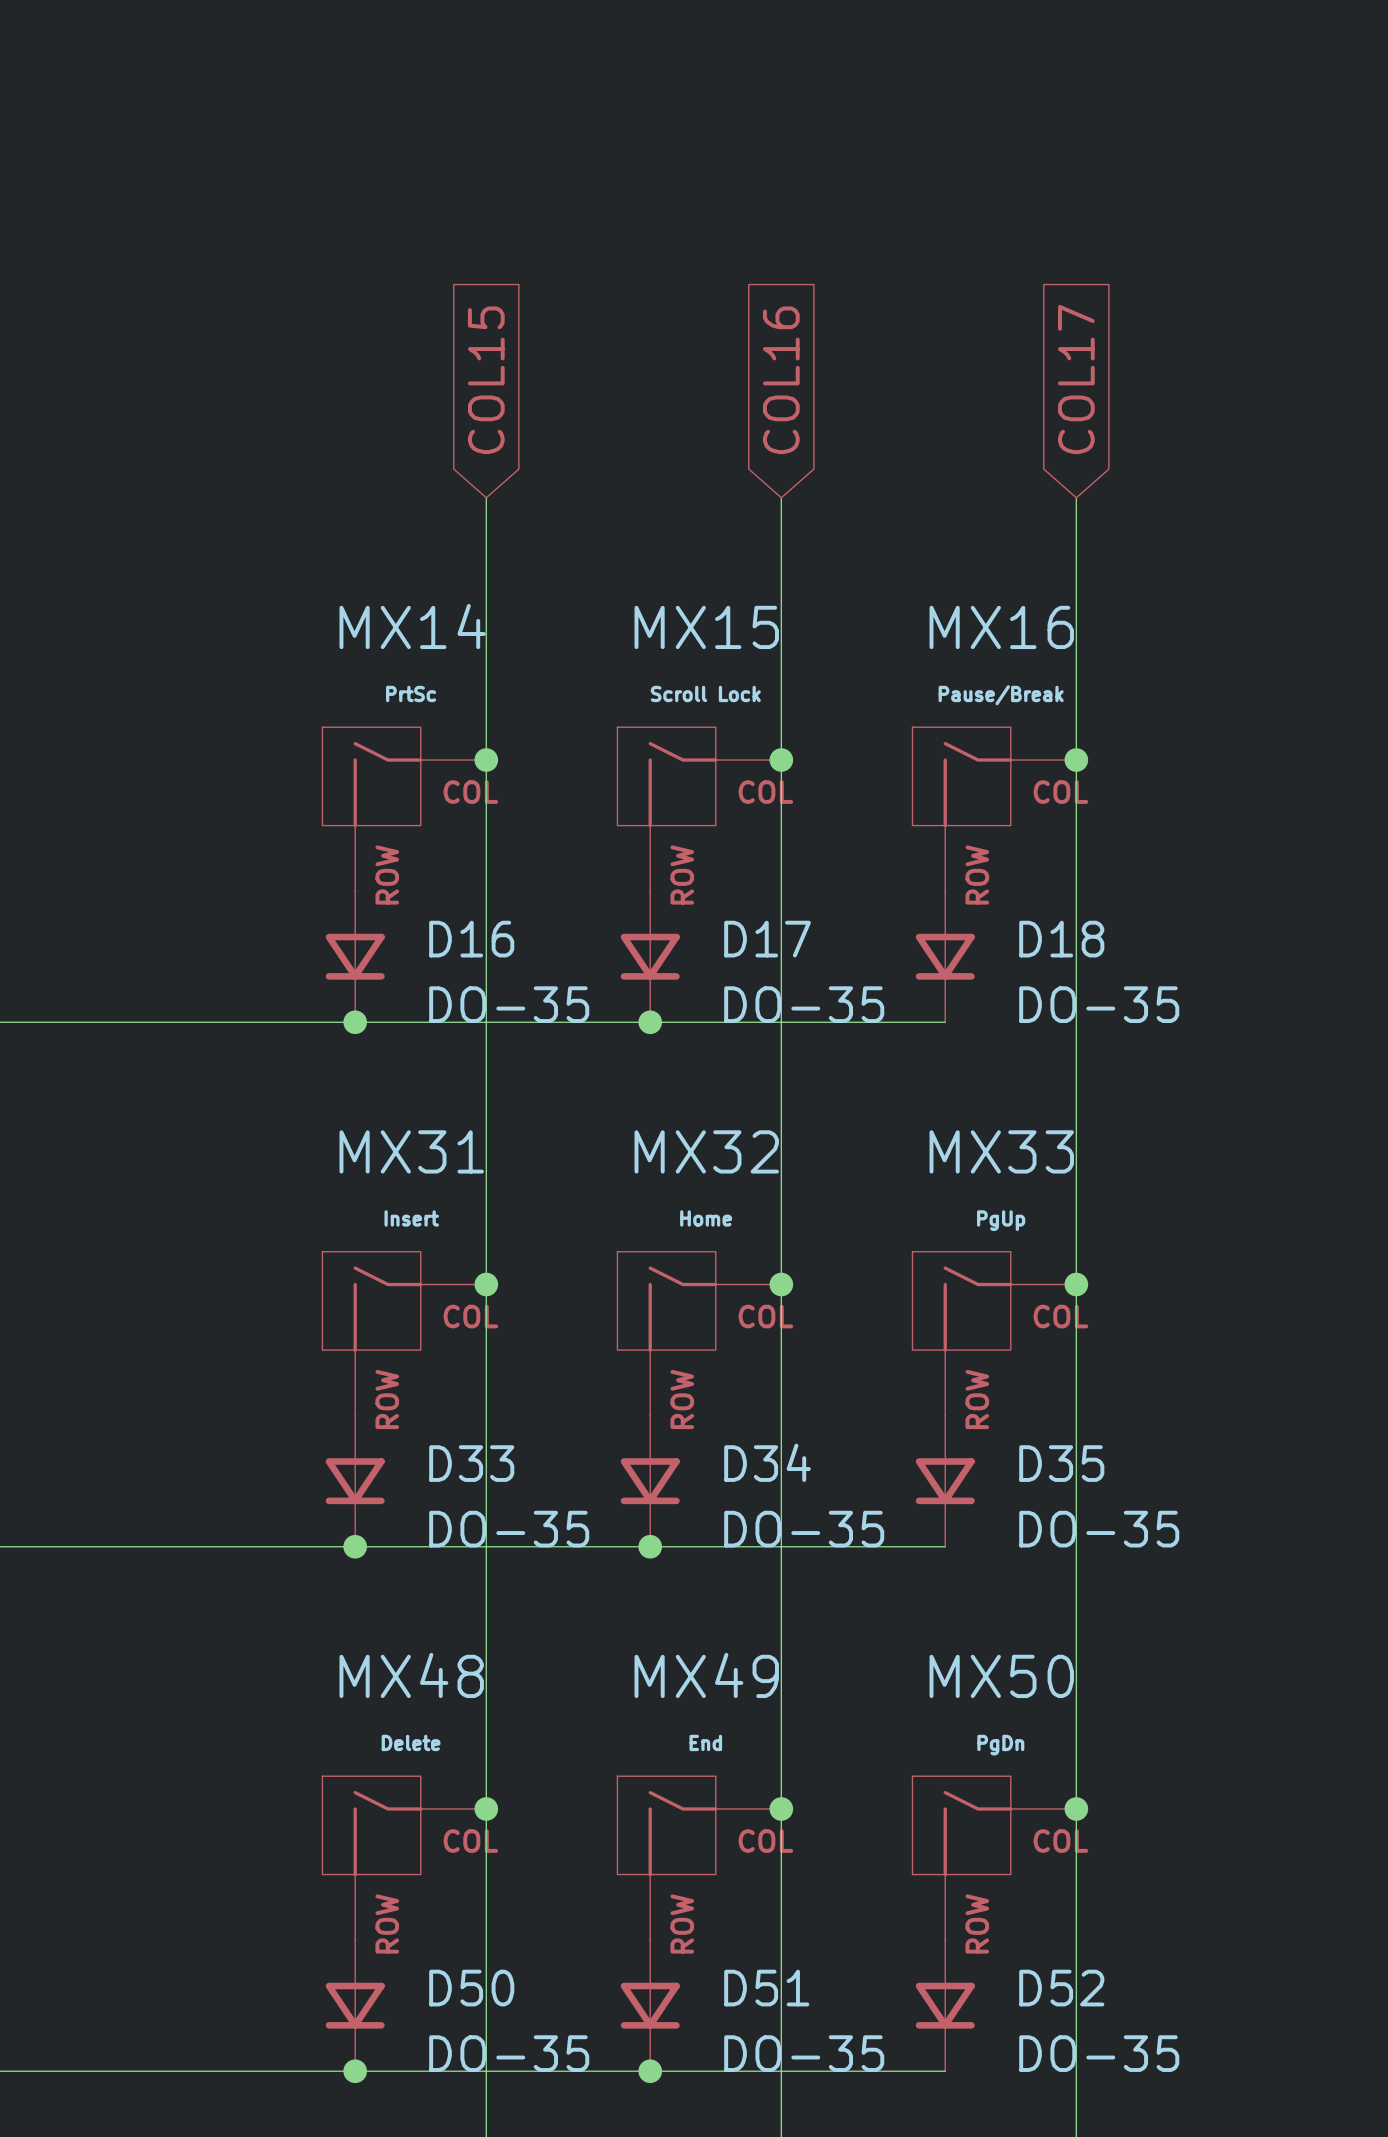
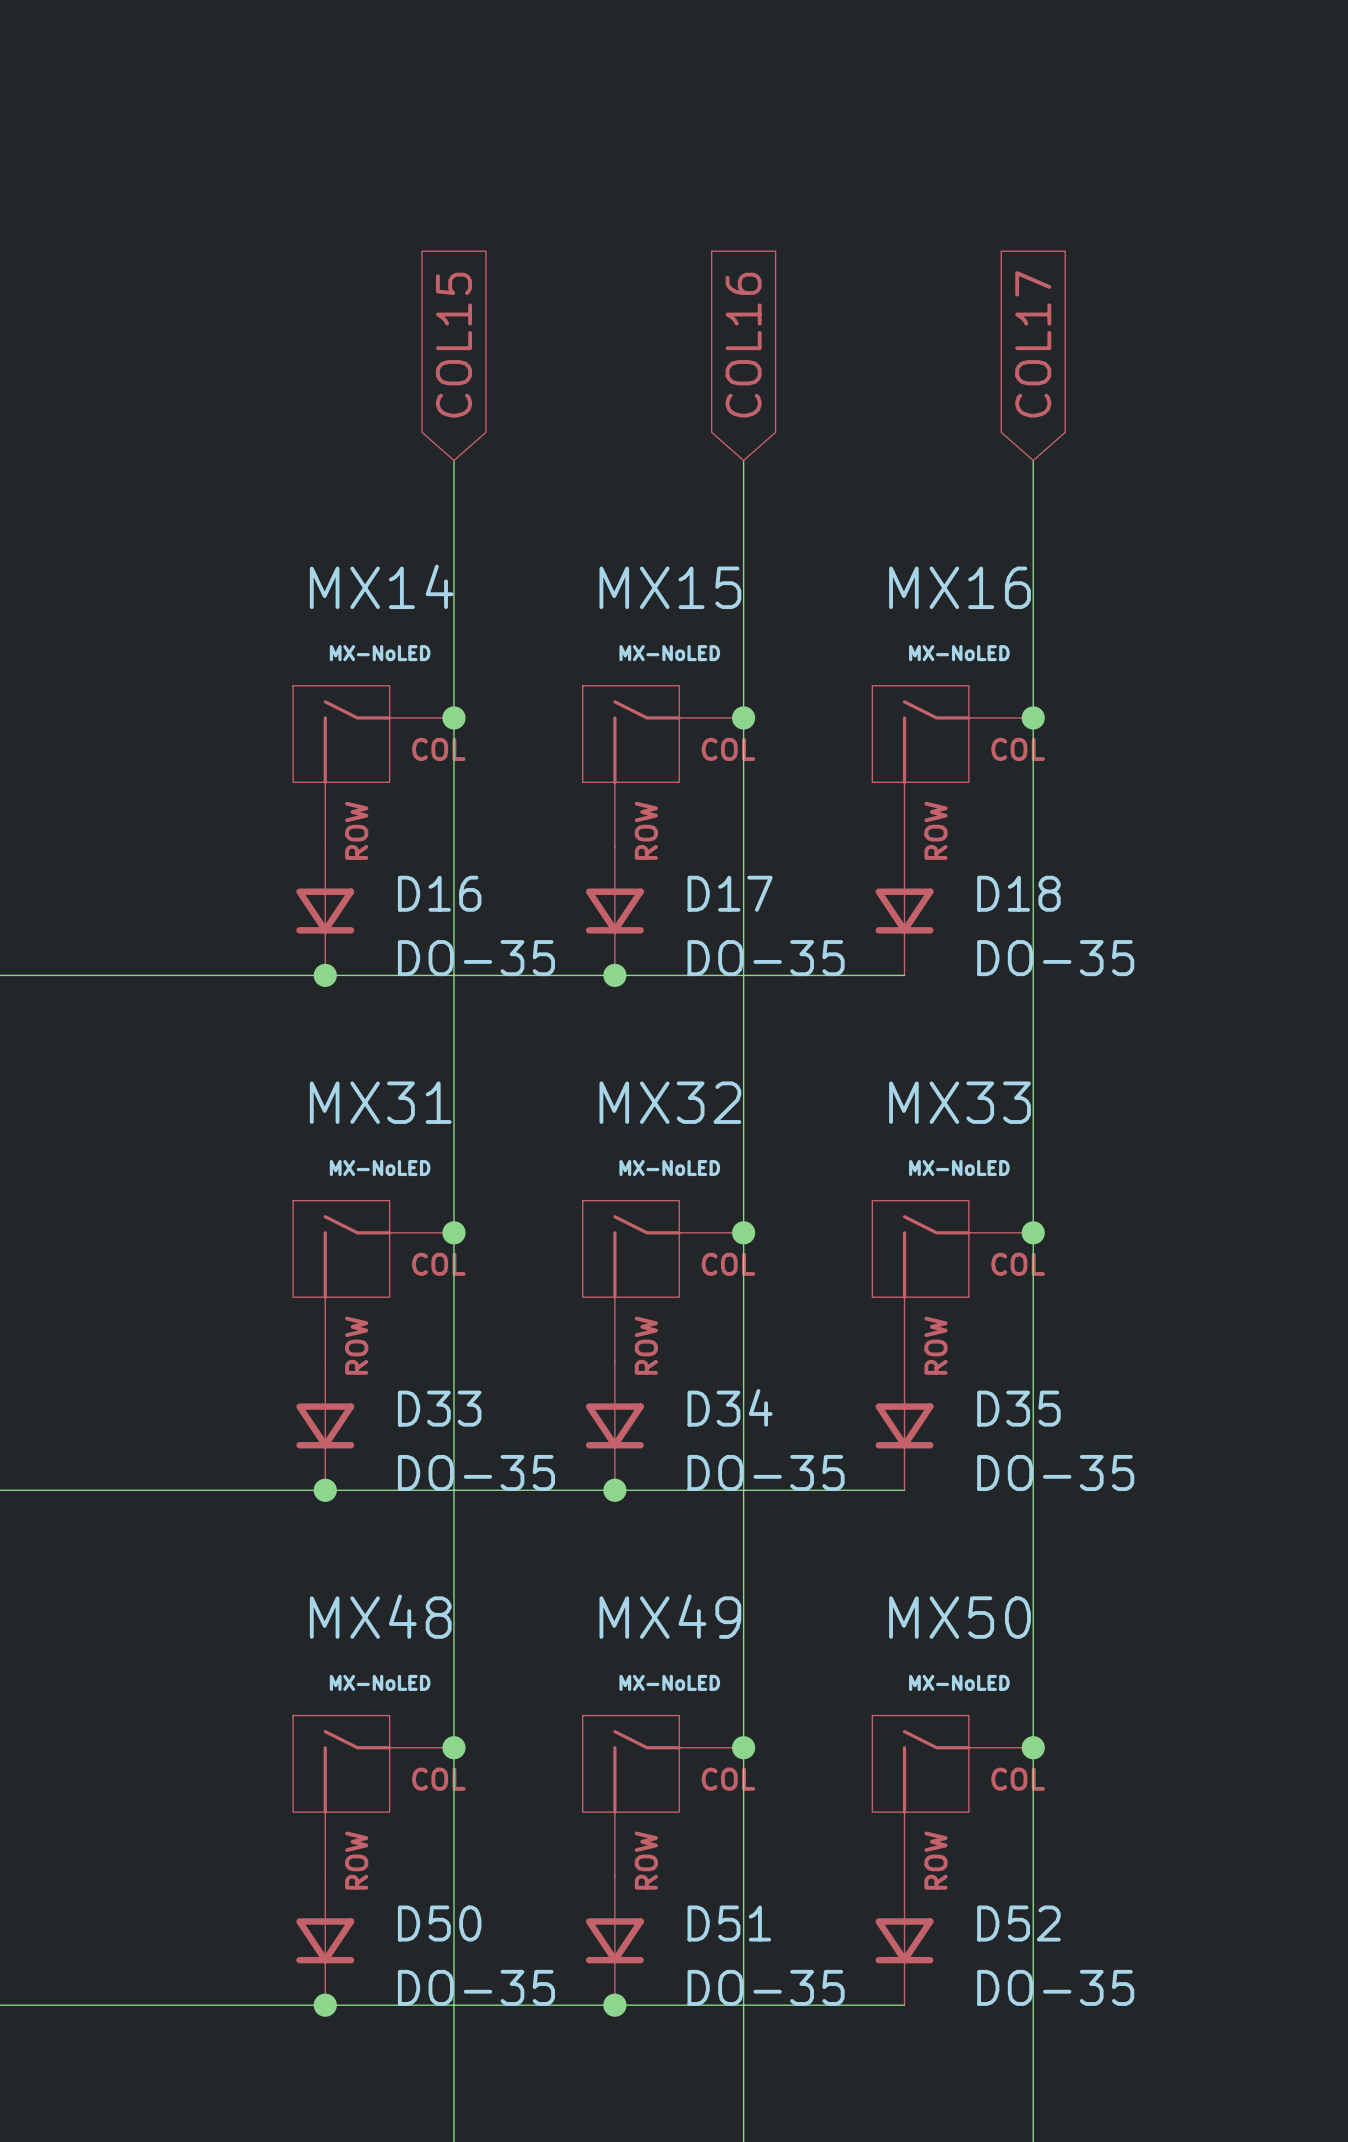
MX14 value: PrtSc (411, 693) -> MX-NoLED (380, 653)
MX15 value: Scroll Lock (705, 693) -> MX-NoLED (669, 653)
MX16 value: Pause/Break (1001, 695) -> MX-NoLED (959, 653)
MX31 value: Insert (411, 1218) -> MX-NoLED (380, 1168)
MX32 value: Home (706, 1218) -> MX-NoLED (669, 1168)
MX33 value: PgUp (1001, 1220) -> MX-NoLED (959, 1168)
MX48 value: Delete (411, 1742) -> MX-NoLED (380, 1682)
MX49 value: End (705, 1742) -> MX-NoLED (669, 1682)
MX50 value: PgDn (1000, 1745) -> MX-NoLED (959, 1682)

